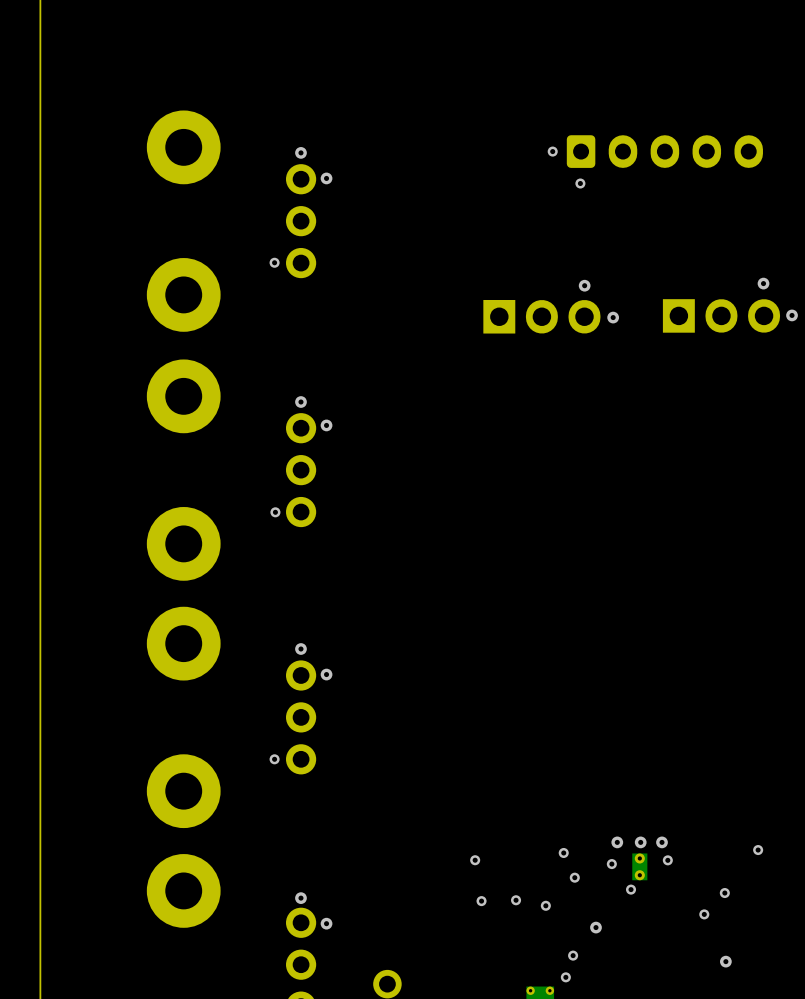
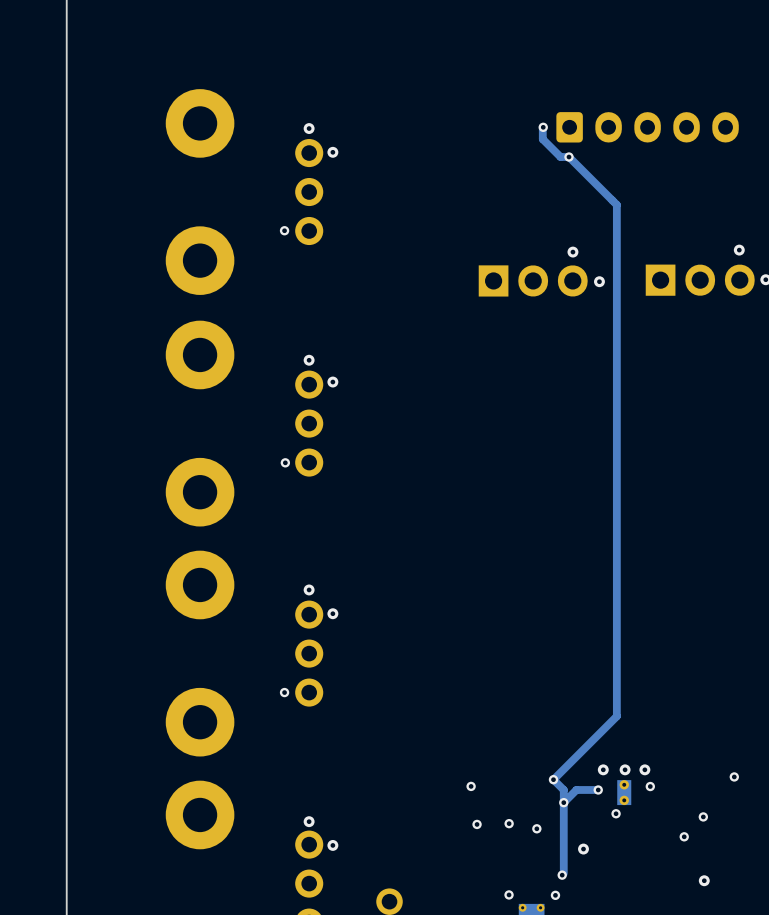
track: none -> (543, 127) (542, 139) (560, 157) (568, 157) (616, 204) (616, 716) (553, 779) (563, 789) (563, 873) (562, 875)
track: none -> (598, 789) (576, 789) (563, 802)
via: none -> (509, 894)

